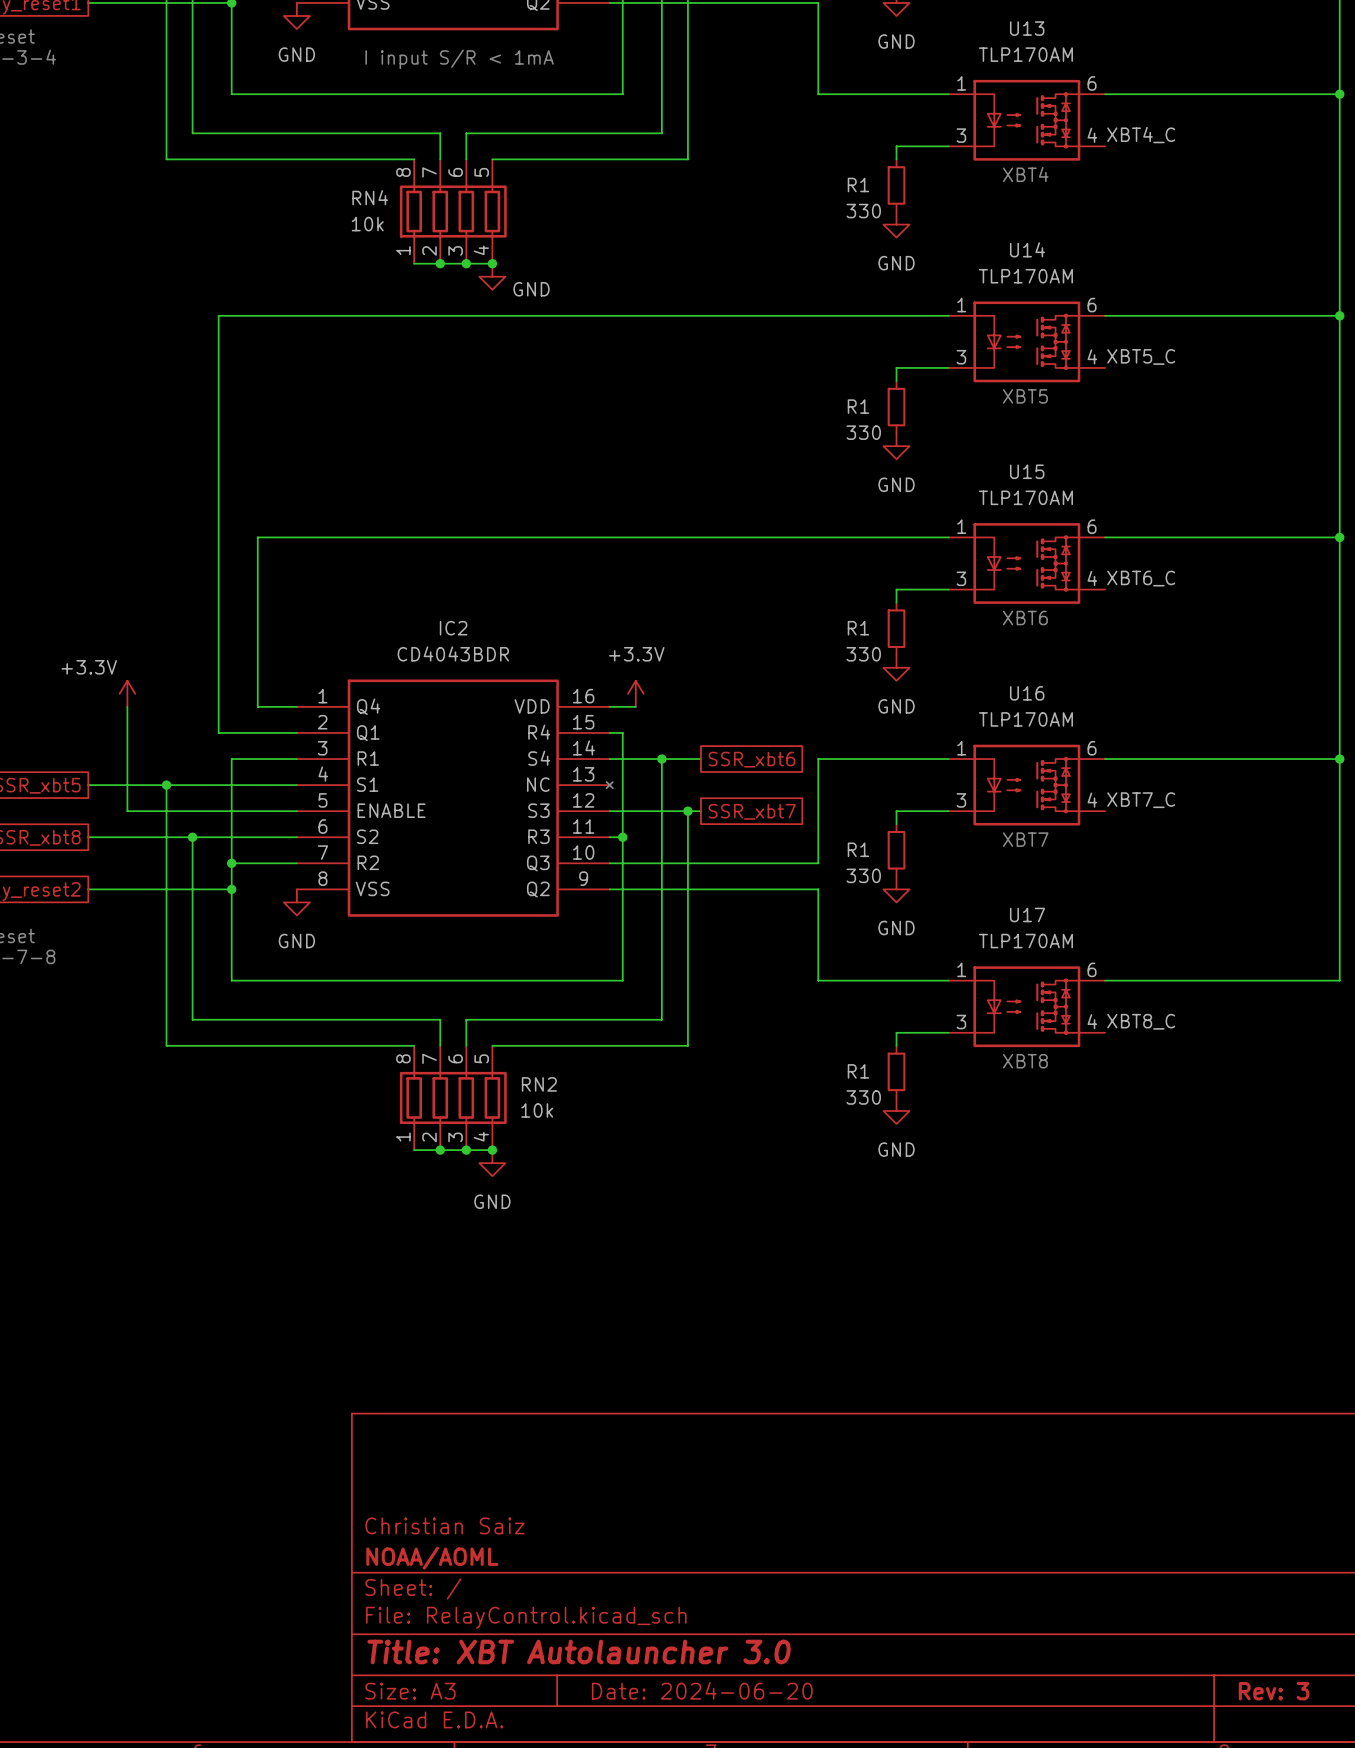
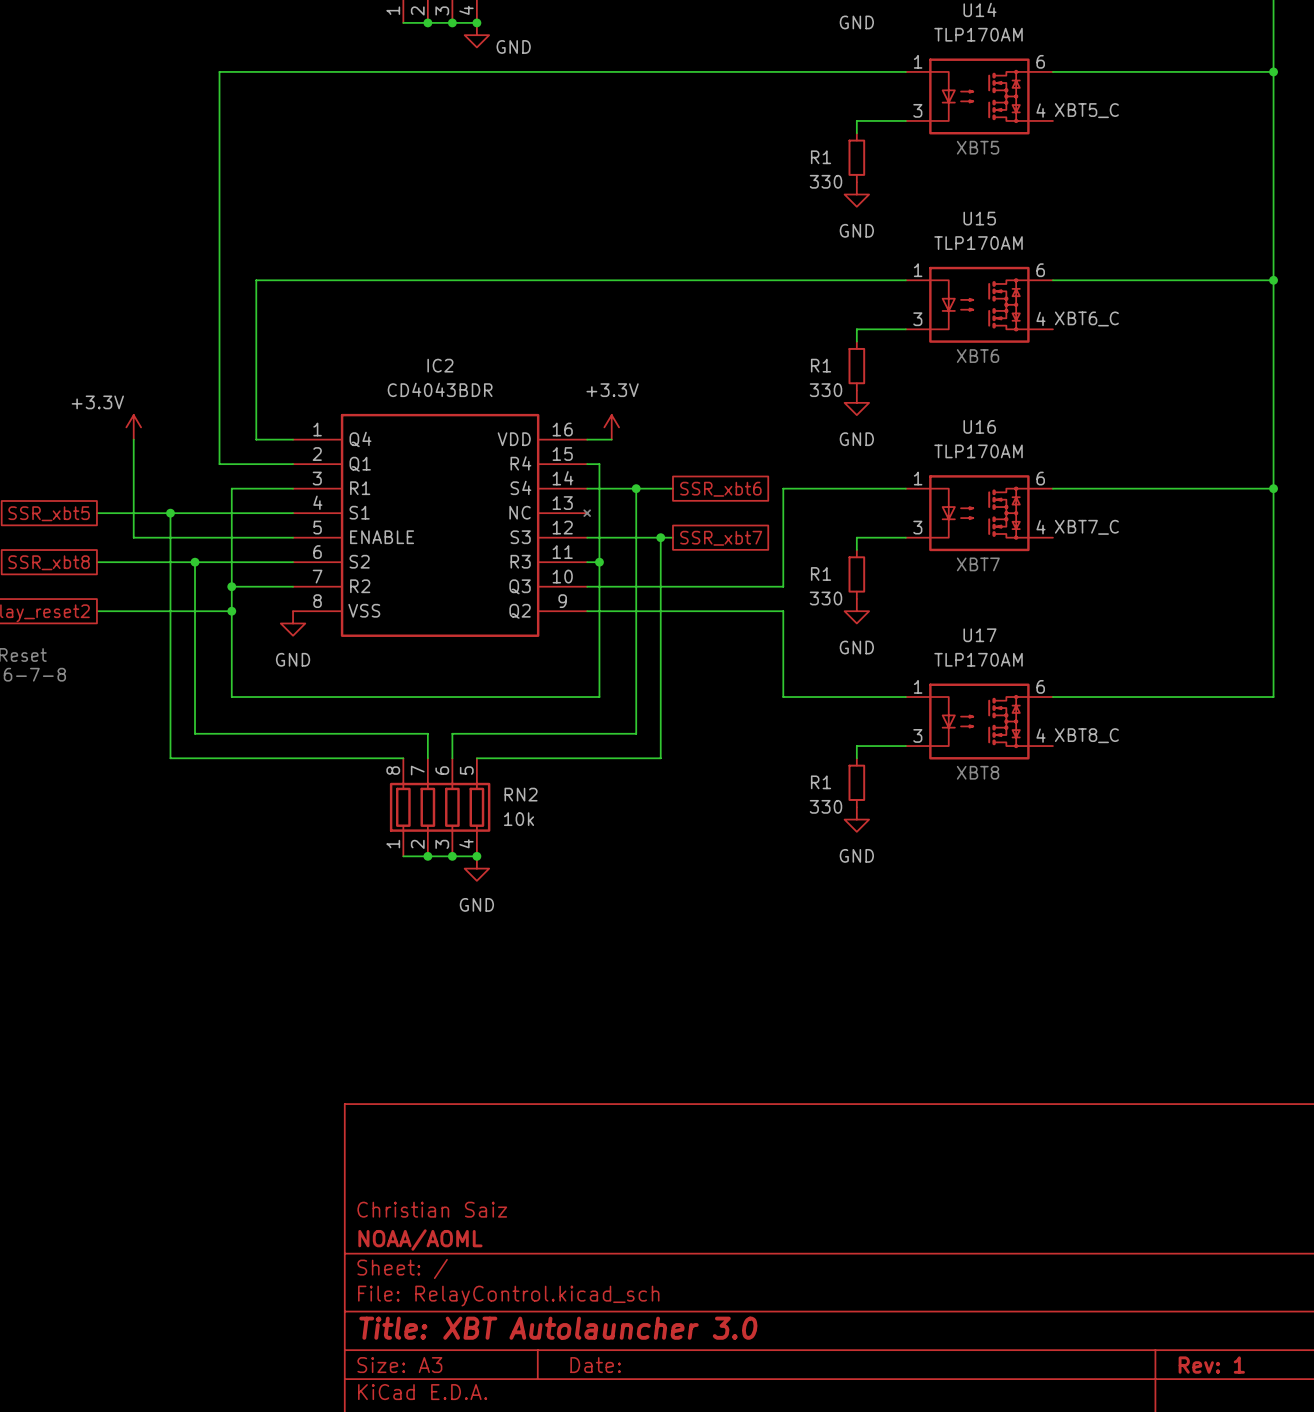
title block: Date: 2024-06-20 (702, 1690) -> Date: (595, 1365)
title block: Rev: 3 (1274, 1691) -> Rev: 1 (1211, 1365)

